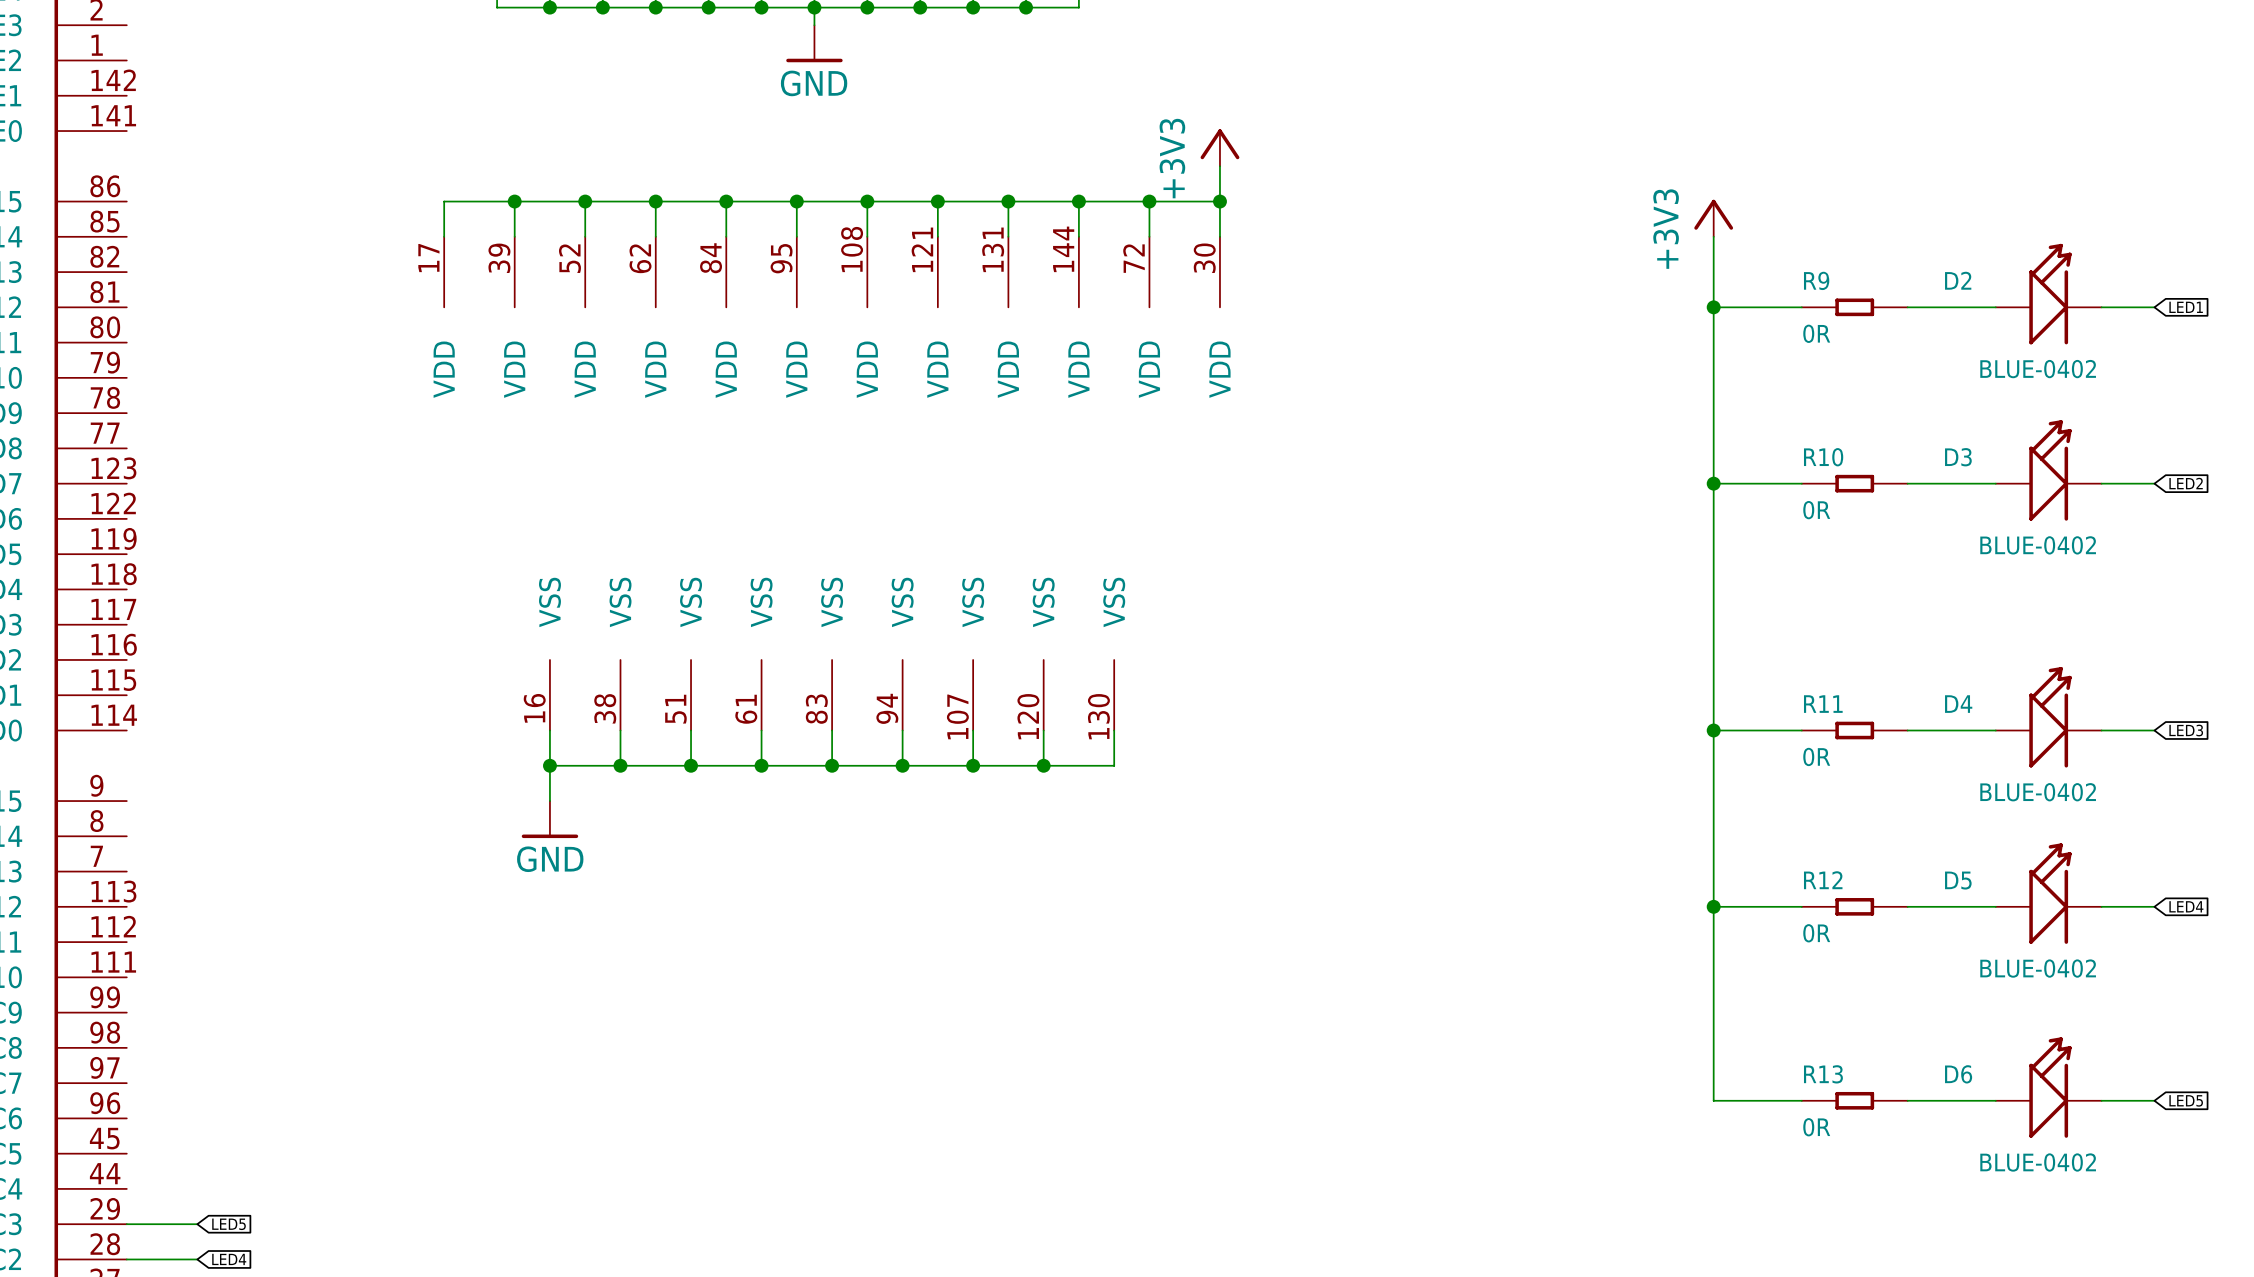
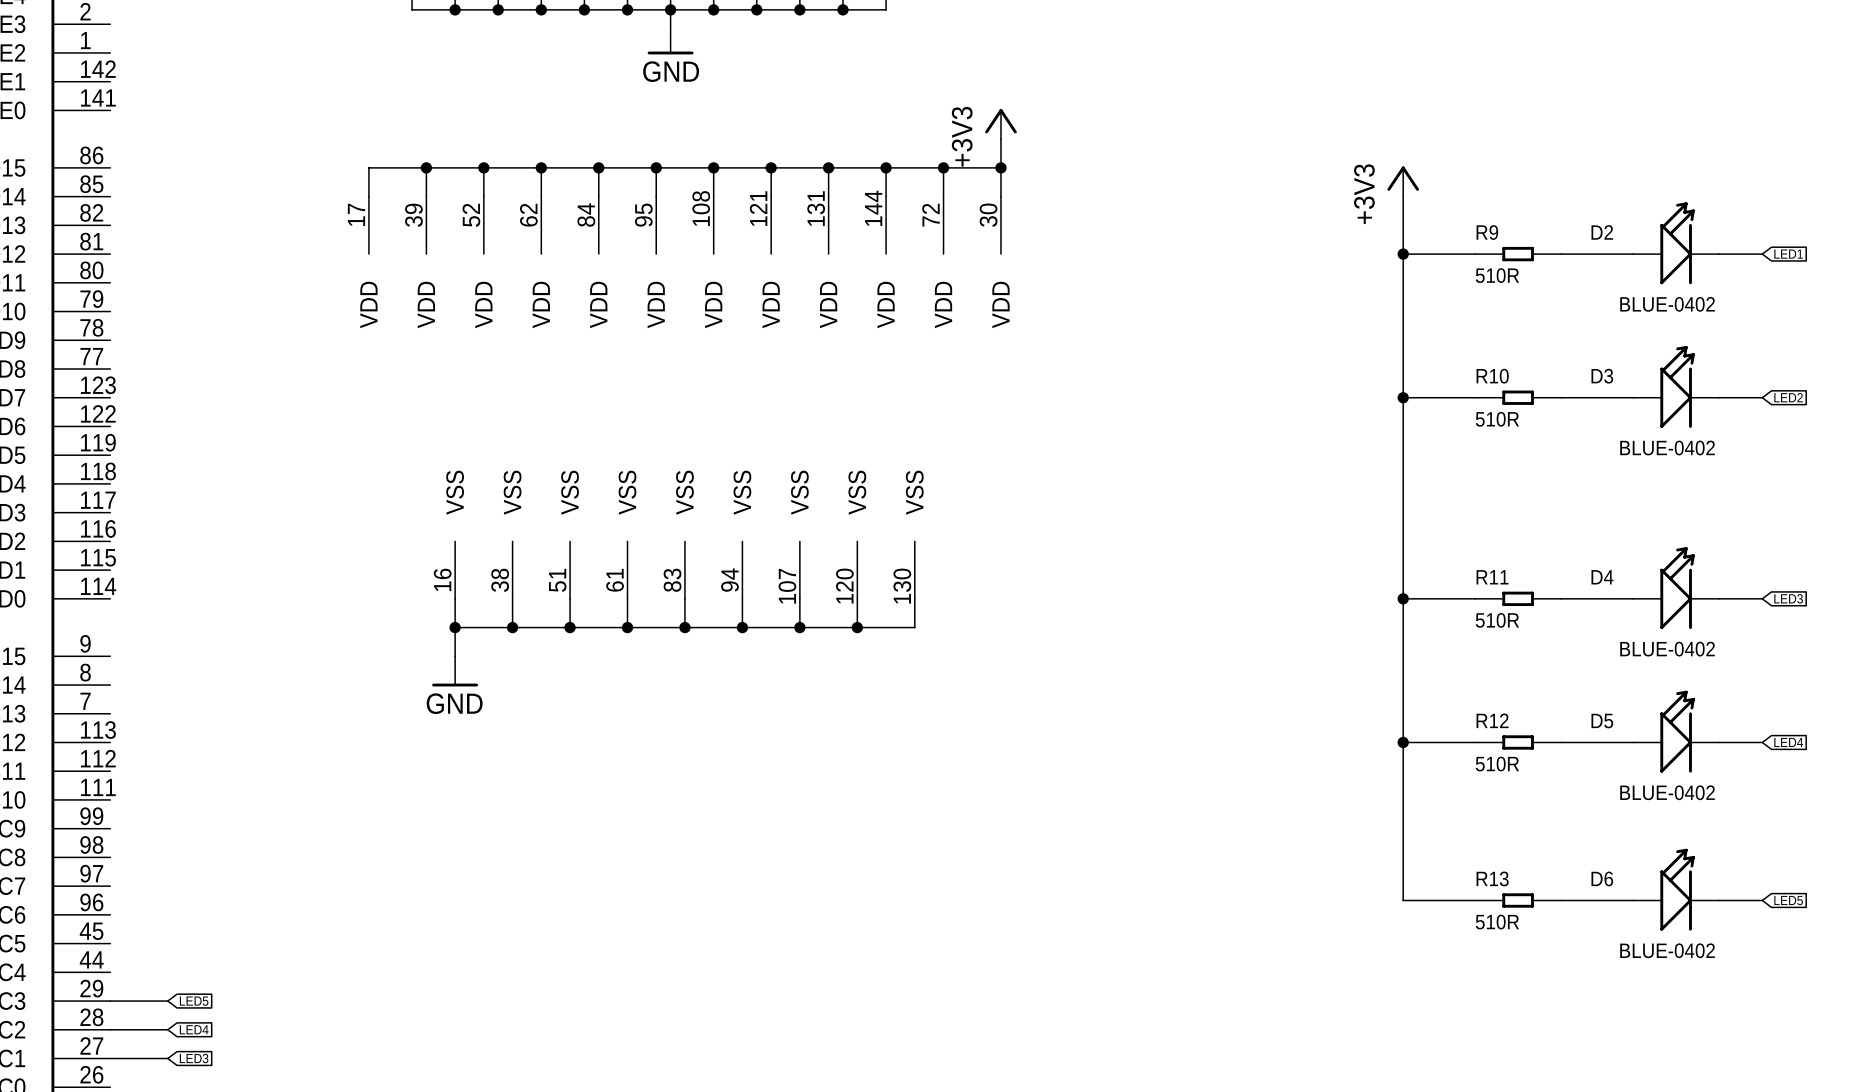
R9 value: 0R (1816, 333) -> 510R (1497, 275)
R10 value: 0R (1816, 510) -> 510R (1497, 419)
R11 value: 0R (1816, 756) -> 510R (1497, 620)
R12 value: 0R (1816, 933) -> 510R (1497, 764)
R13 value: 0R (1816, 1127) -> 510R (1497, 922)

